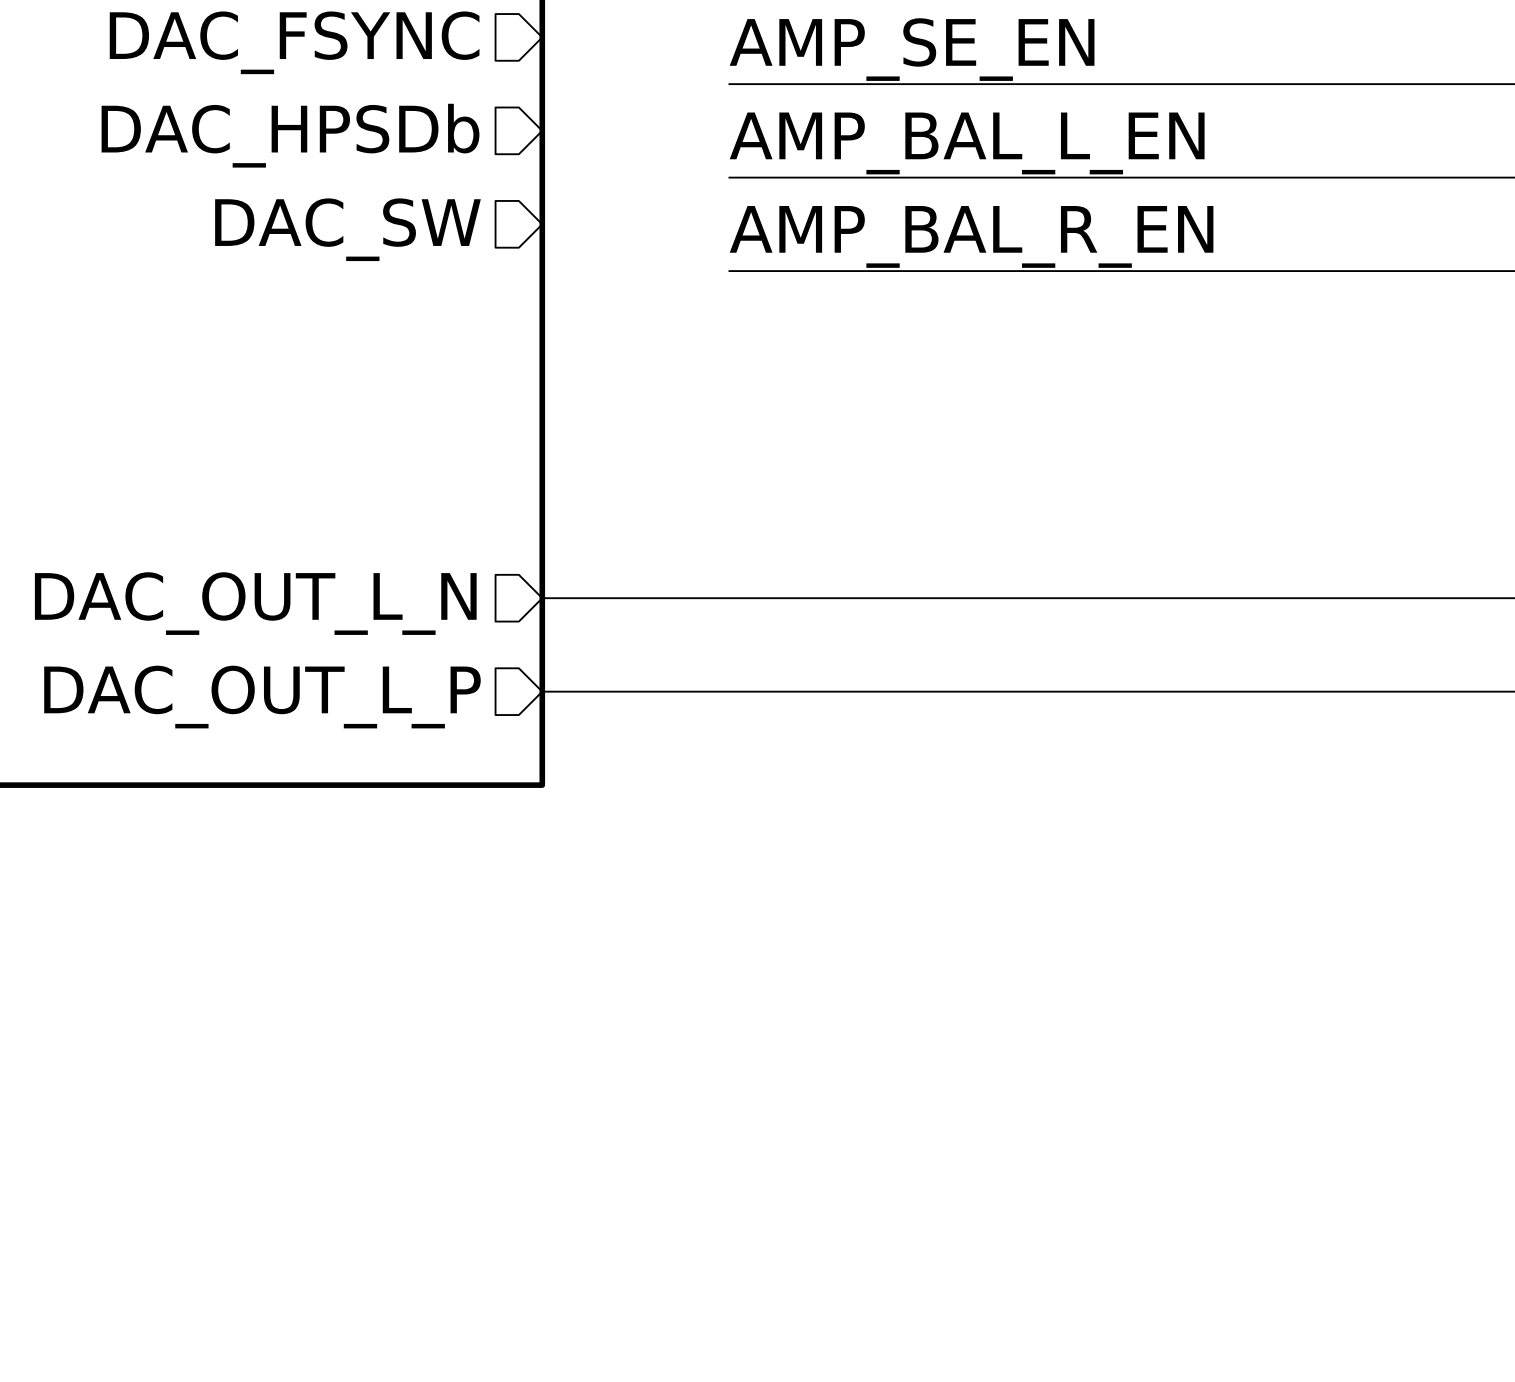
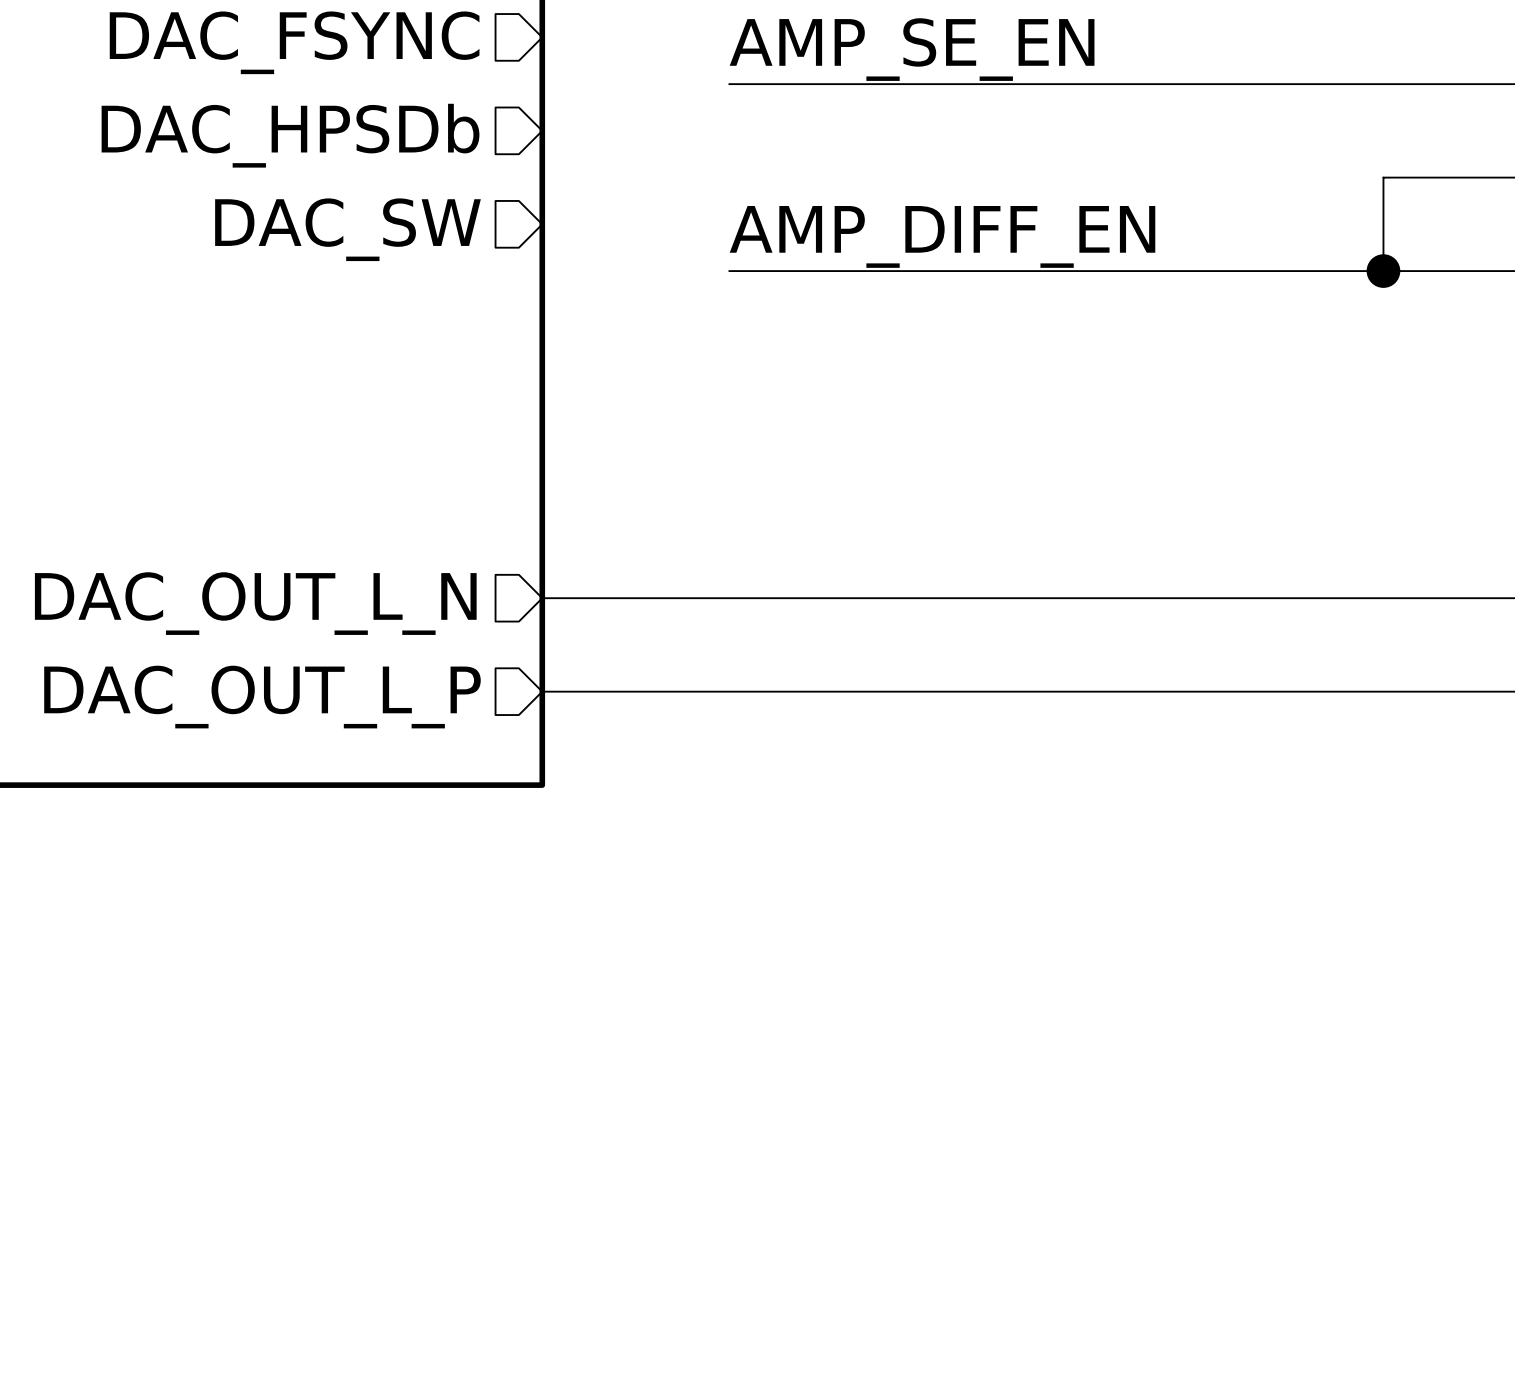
label: AMP_BAL_L_EN (967, 143) -> none
wire: (729, 177) (1383, 177) -> (1383, 271) (1383, 177)
label: AMP_BAL_R_EN (971, 236) -> AMP_DIFF_EN (942, 236)
junction: none -> (1383, 271)

